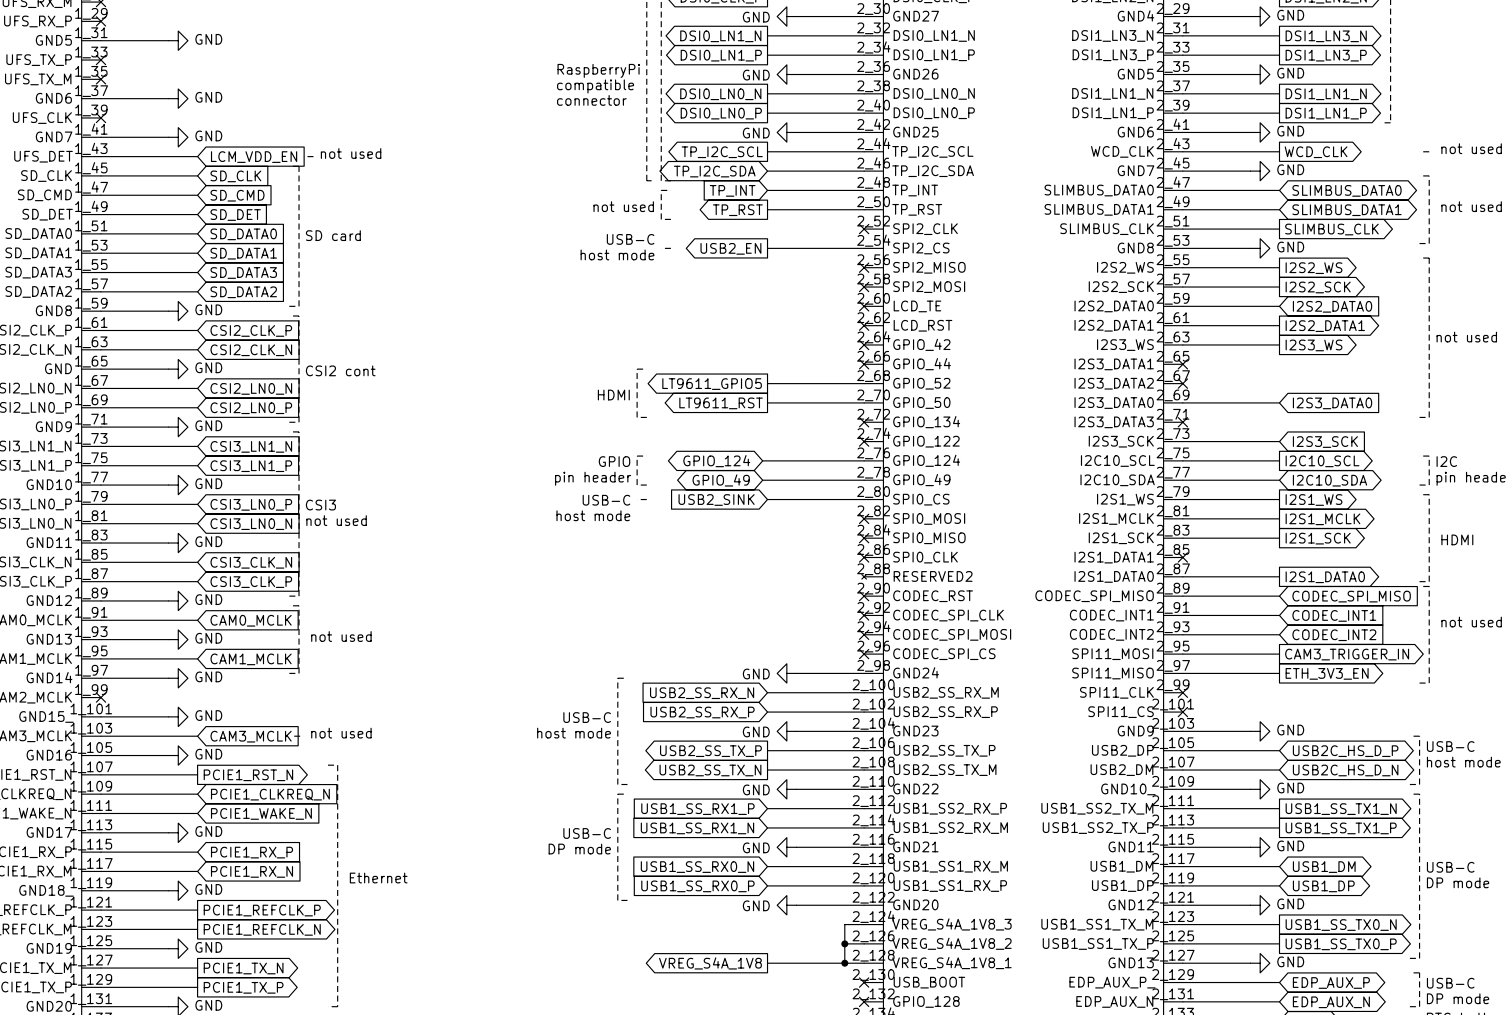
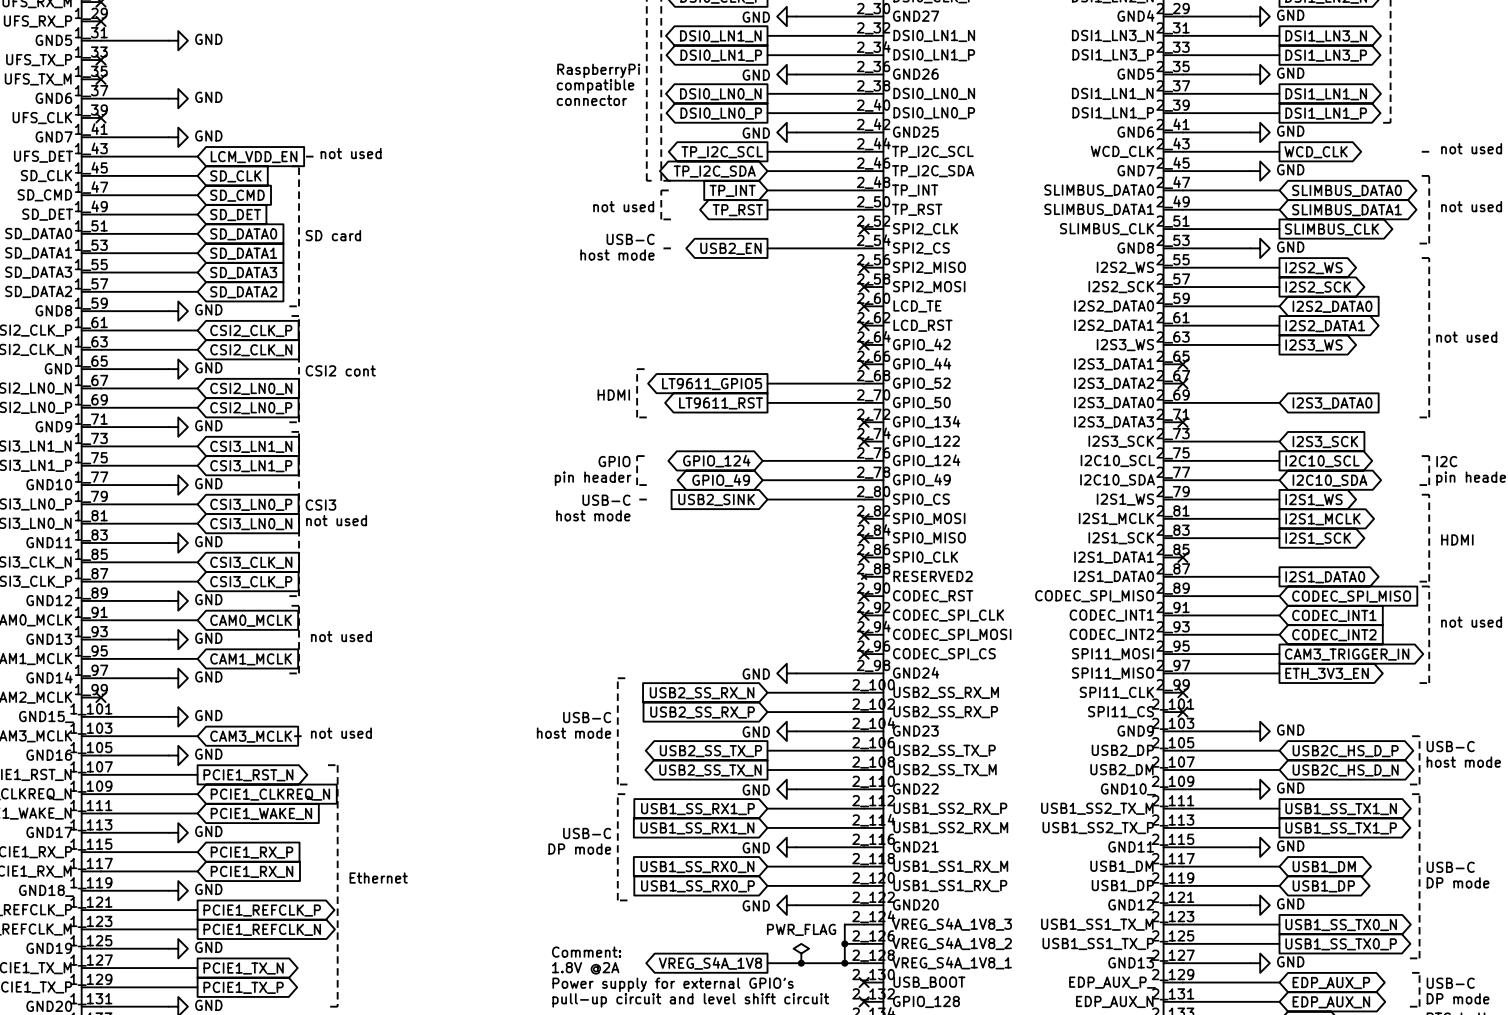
text: none -> Comment: (586, 952)
power symbol: none -> PWR_FLAG (801, 953)
junction: none -> (801, 963)
text: none -> 1.8V @2A (585, 968)
text: none -> Power supply for external GPIO’s (673, 984)
text: none -> pull-up circuit and level shift circuit (690, 1000)

